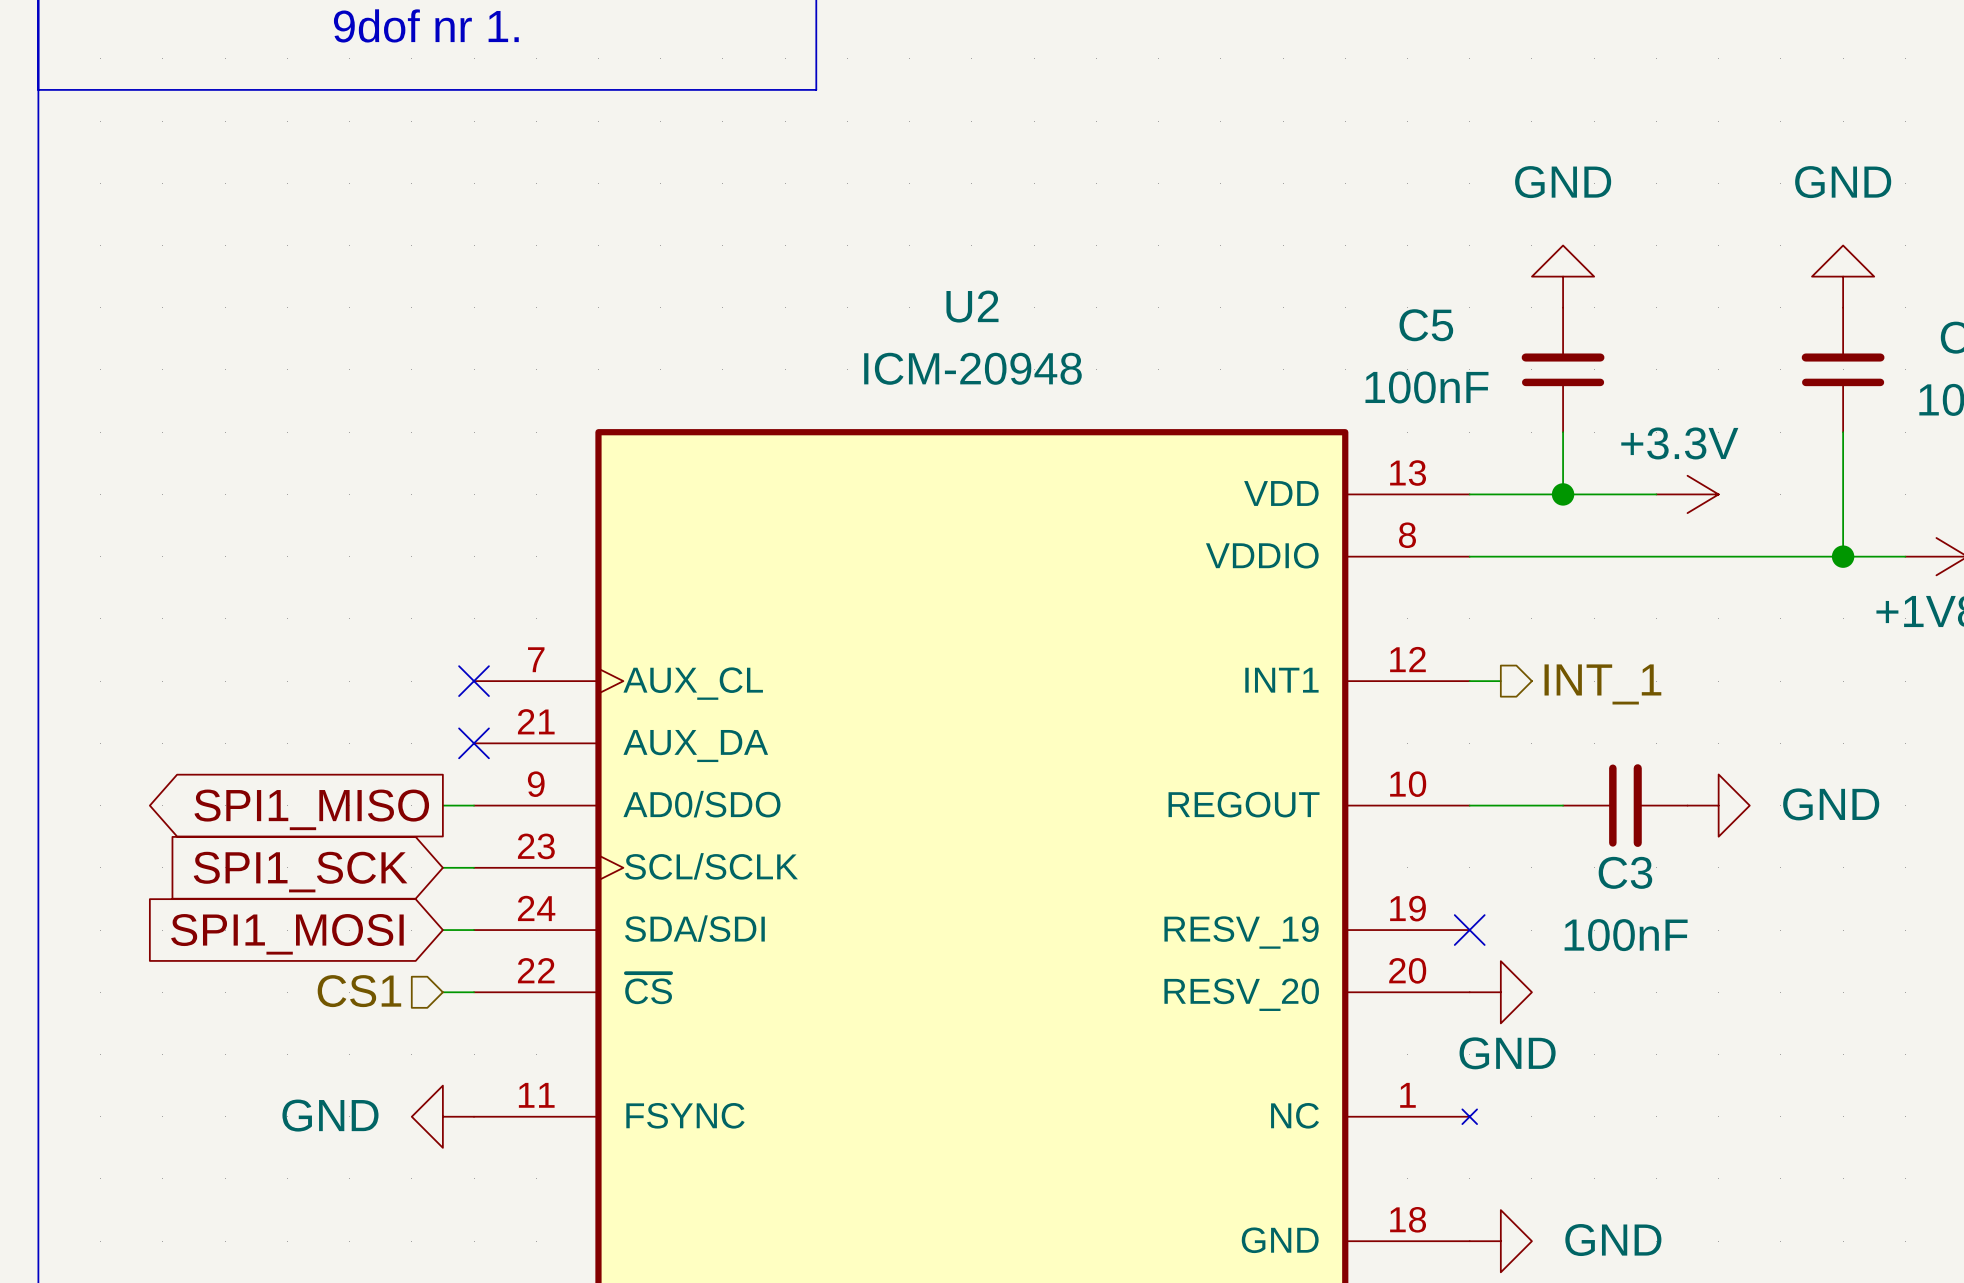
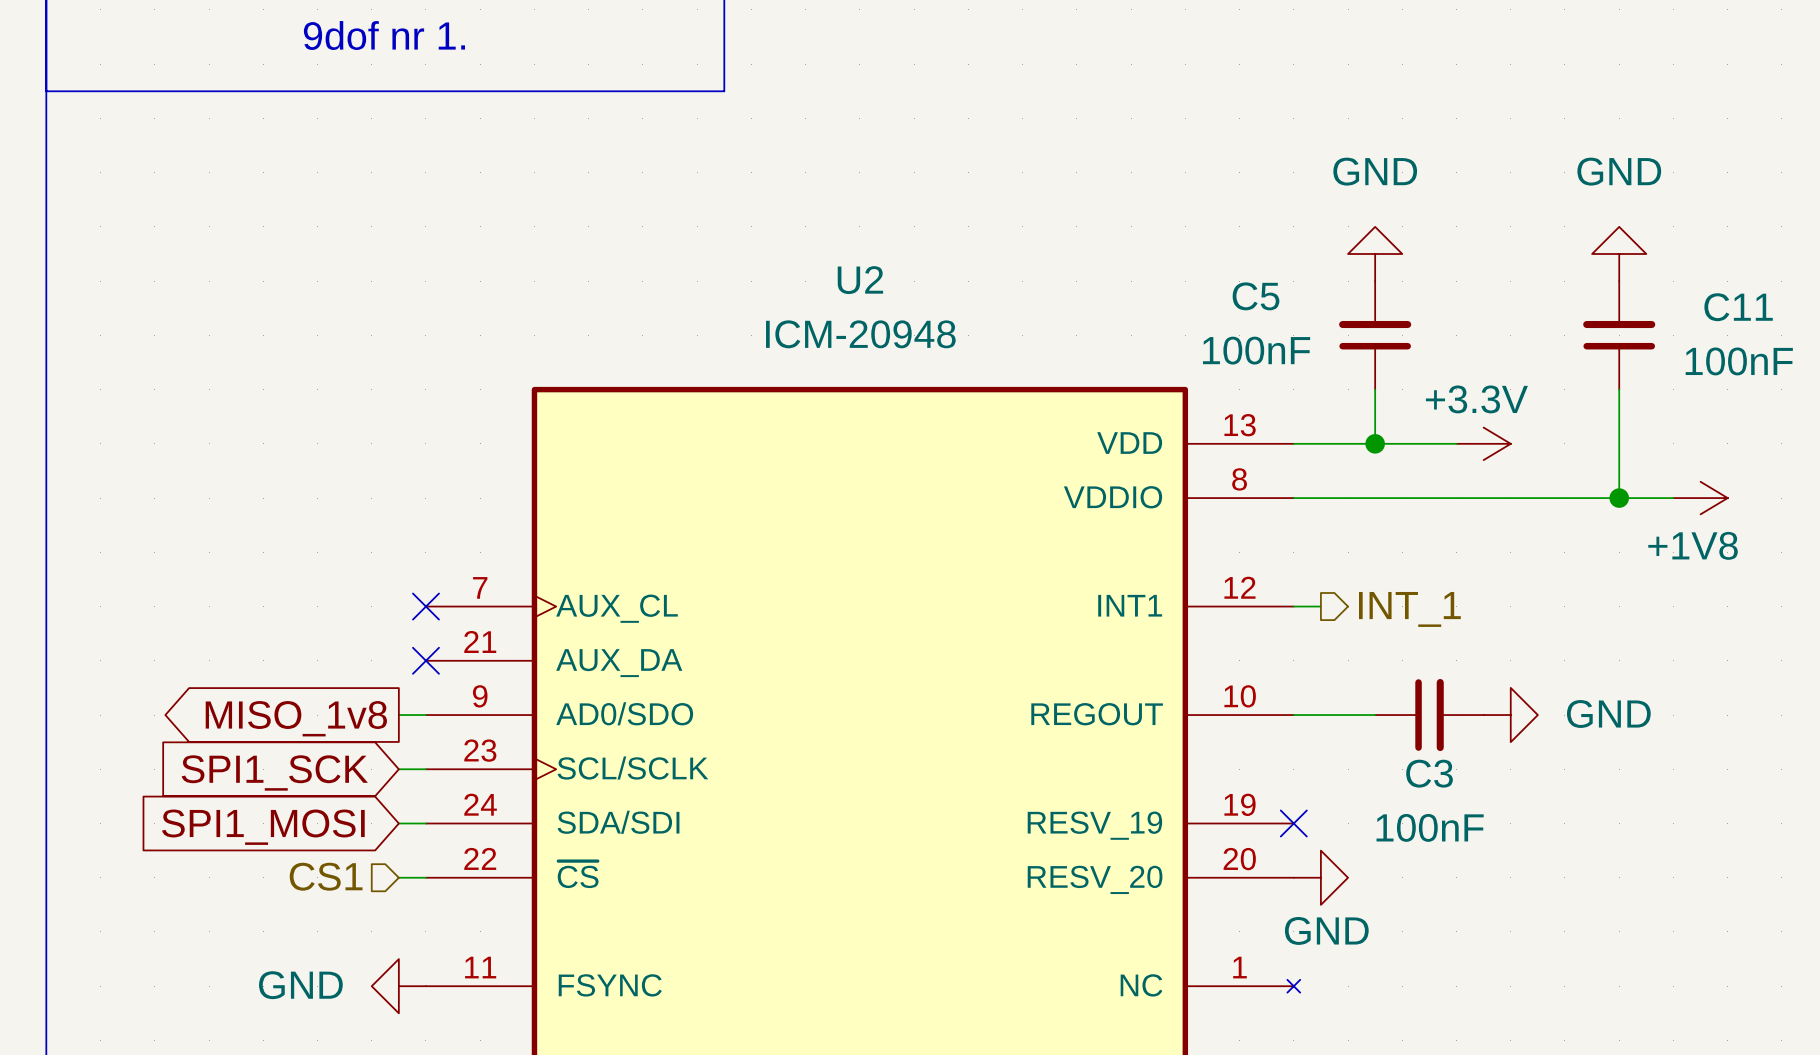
global label: SPI1_MISO (311, 809) -> MISO_1v8 (296, 718)

